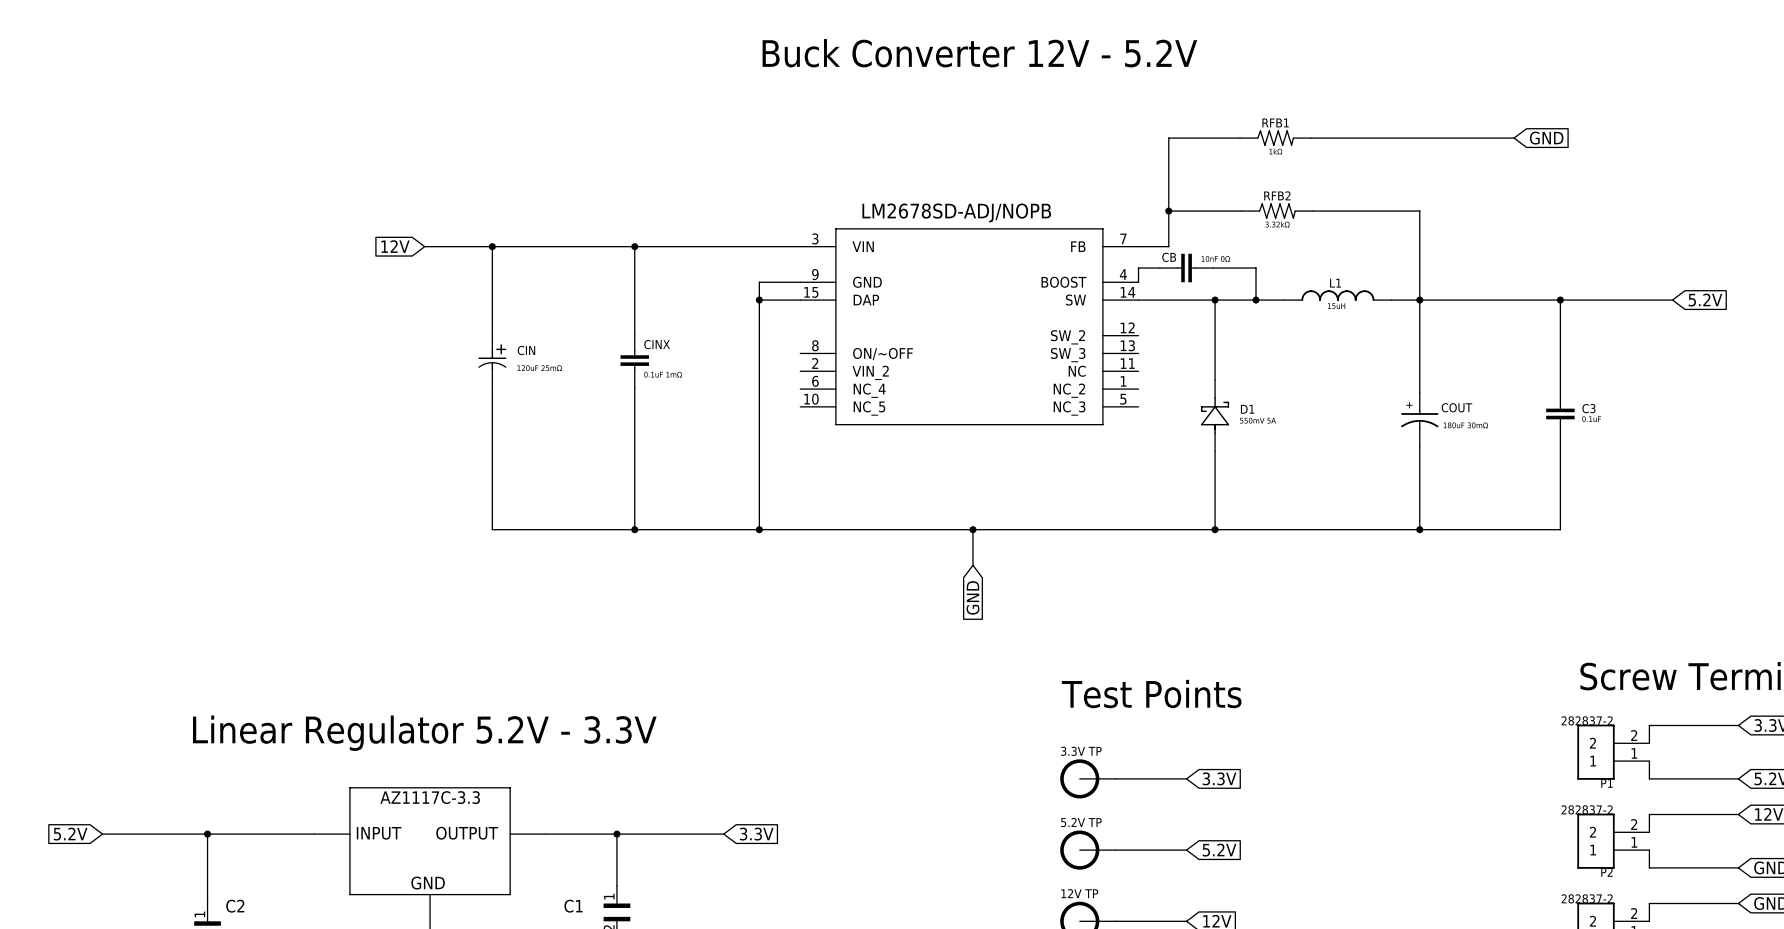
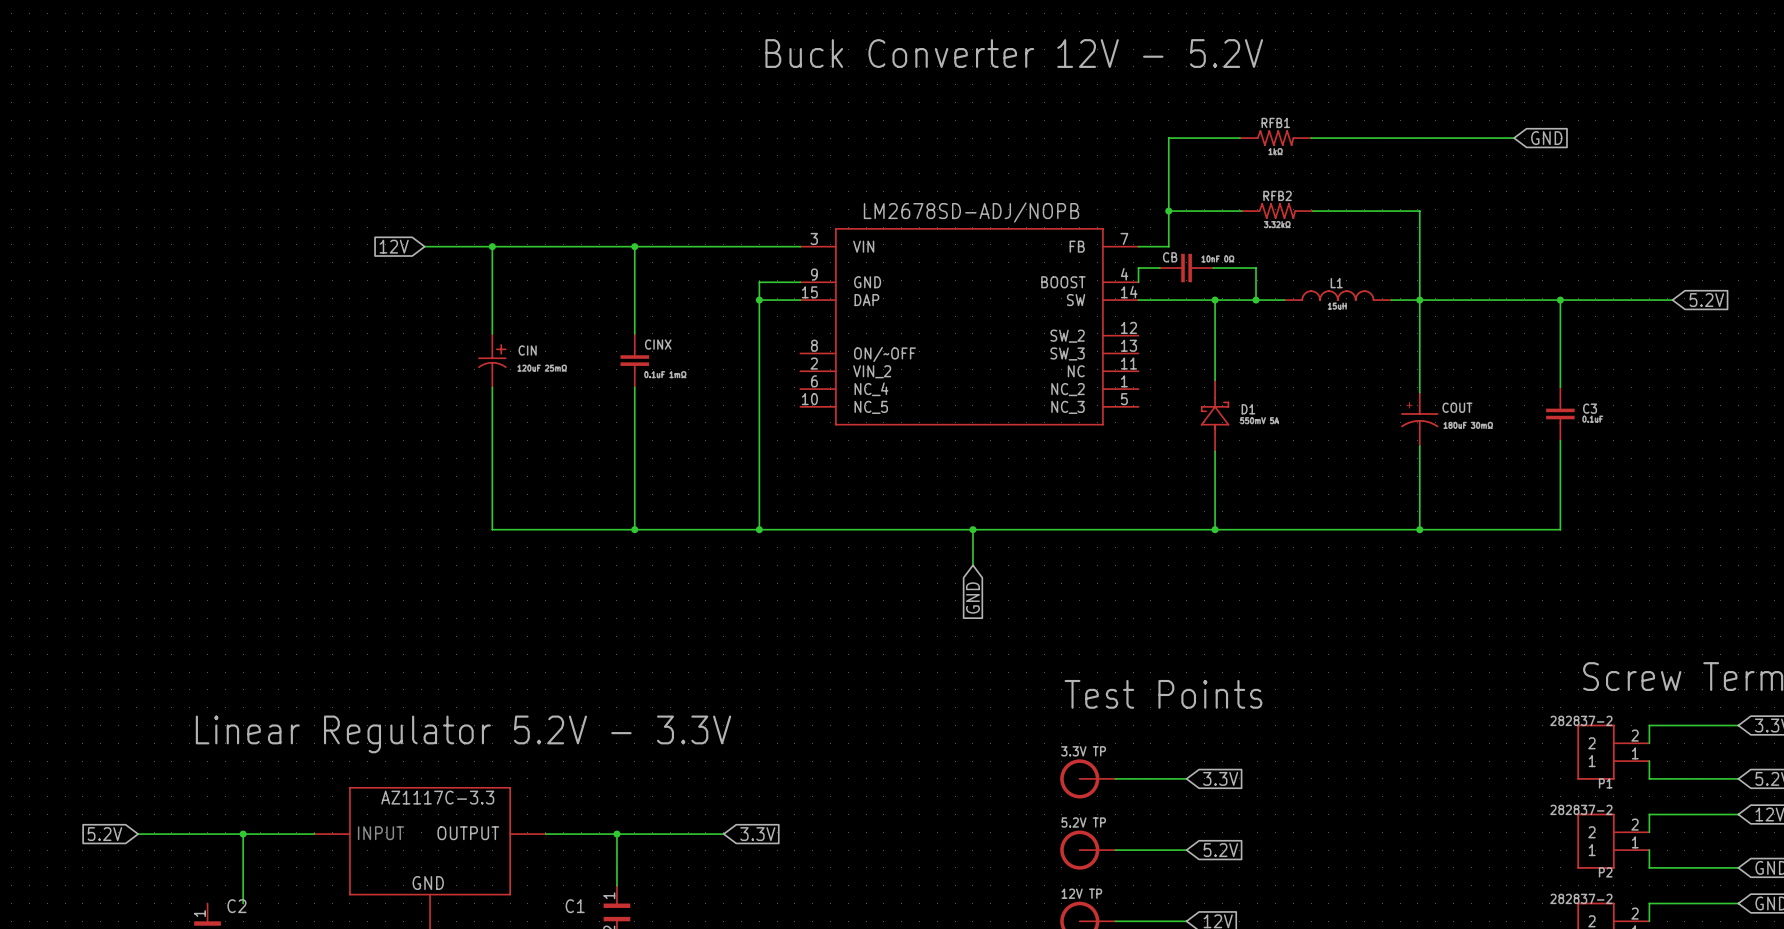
global label position: 5.2V (70, 834) -> 5.2V (104, 834)
wire: (102, 834) (138, 834) -> none
wire: (207, 834) (207, 903) -> (243, 834) (243, 903)
junction position: (207, 834) -> (243, 834)

